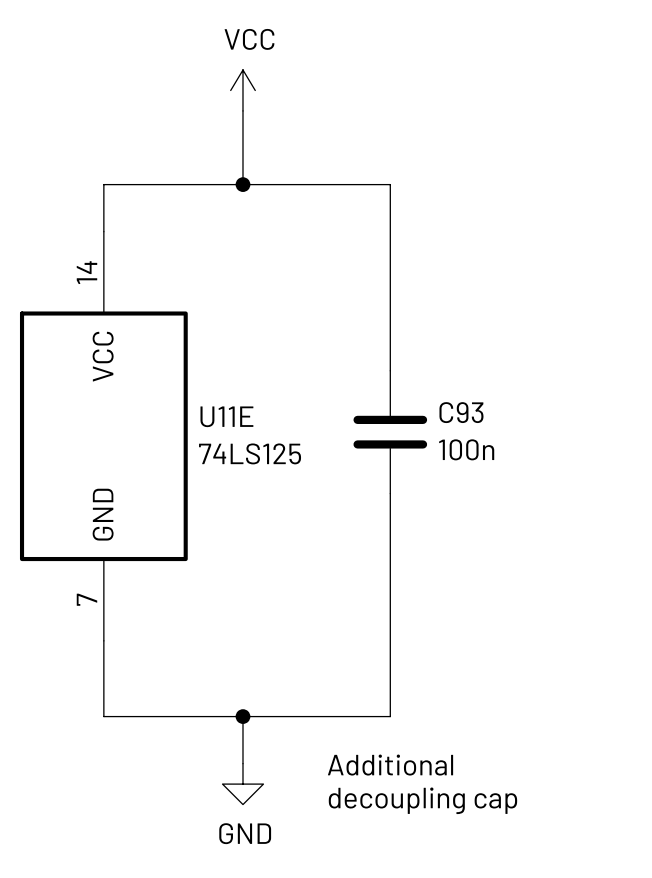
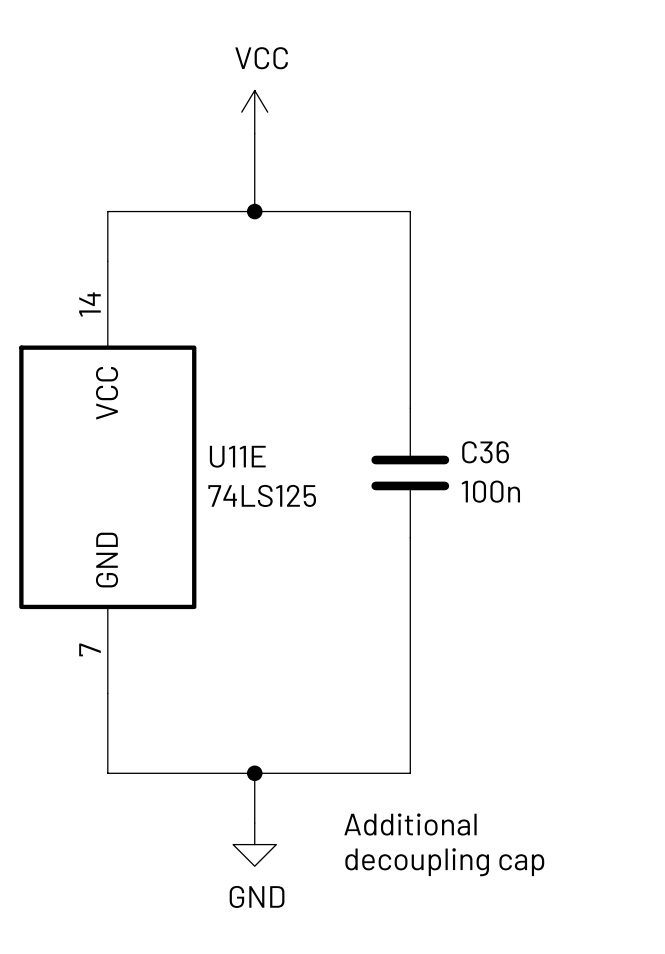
C93 name: C93 (461, 412) -> C36 (485, 452)

